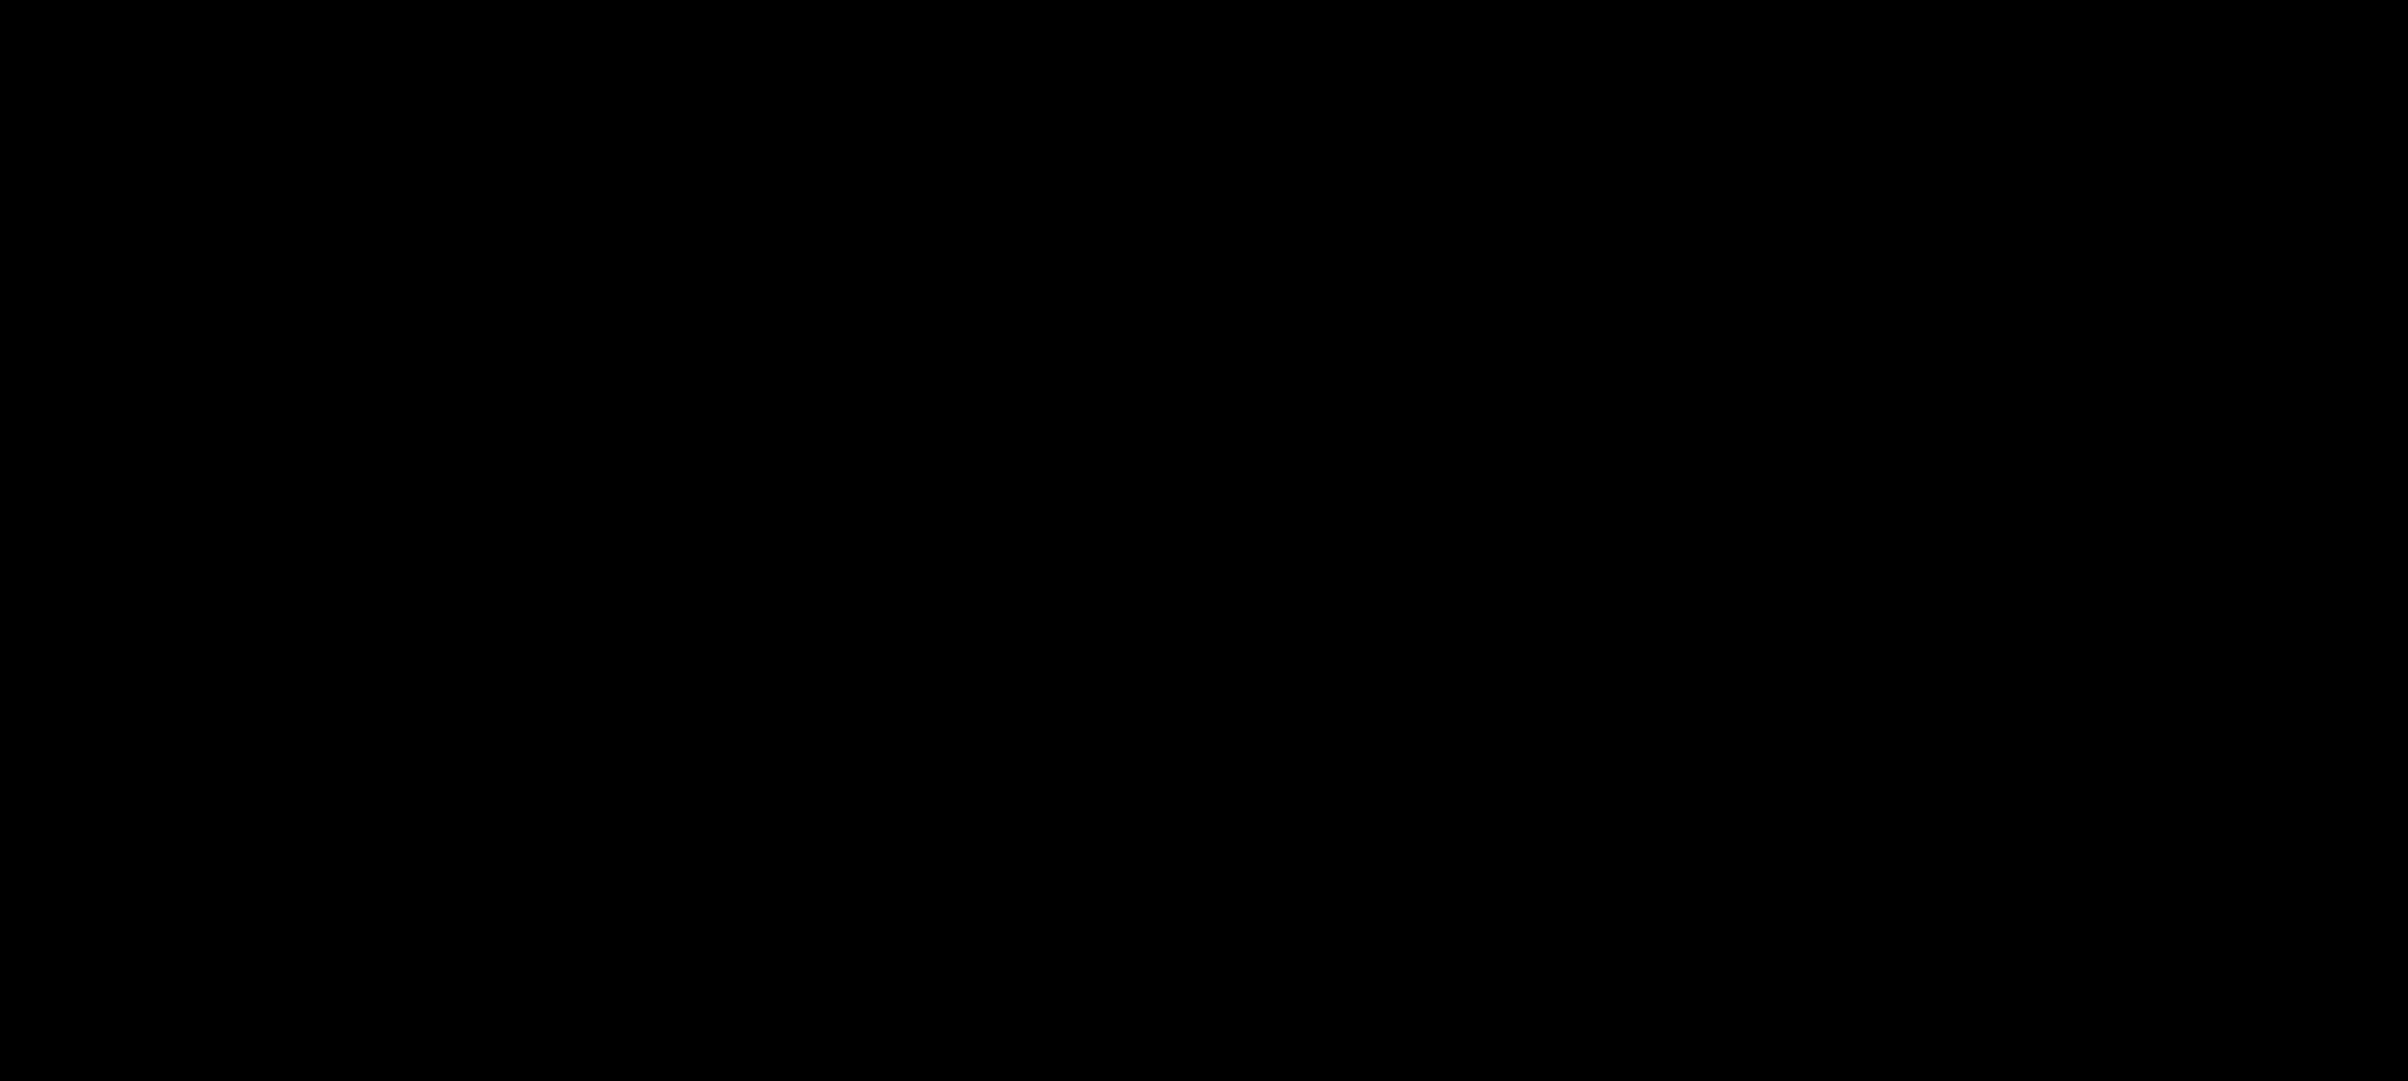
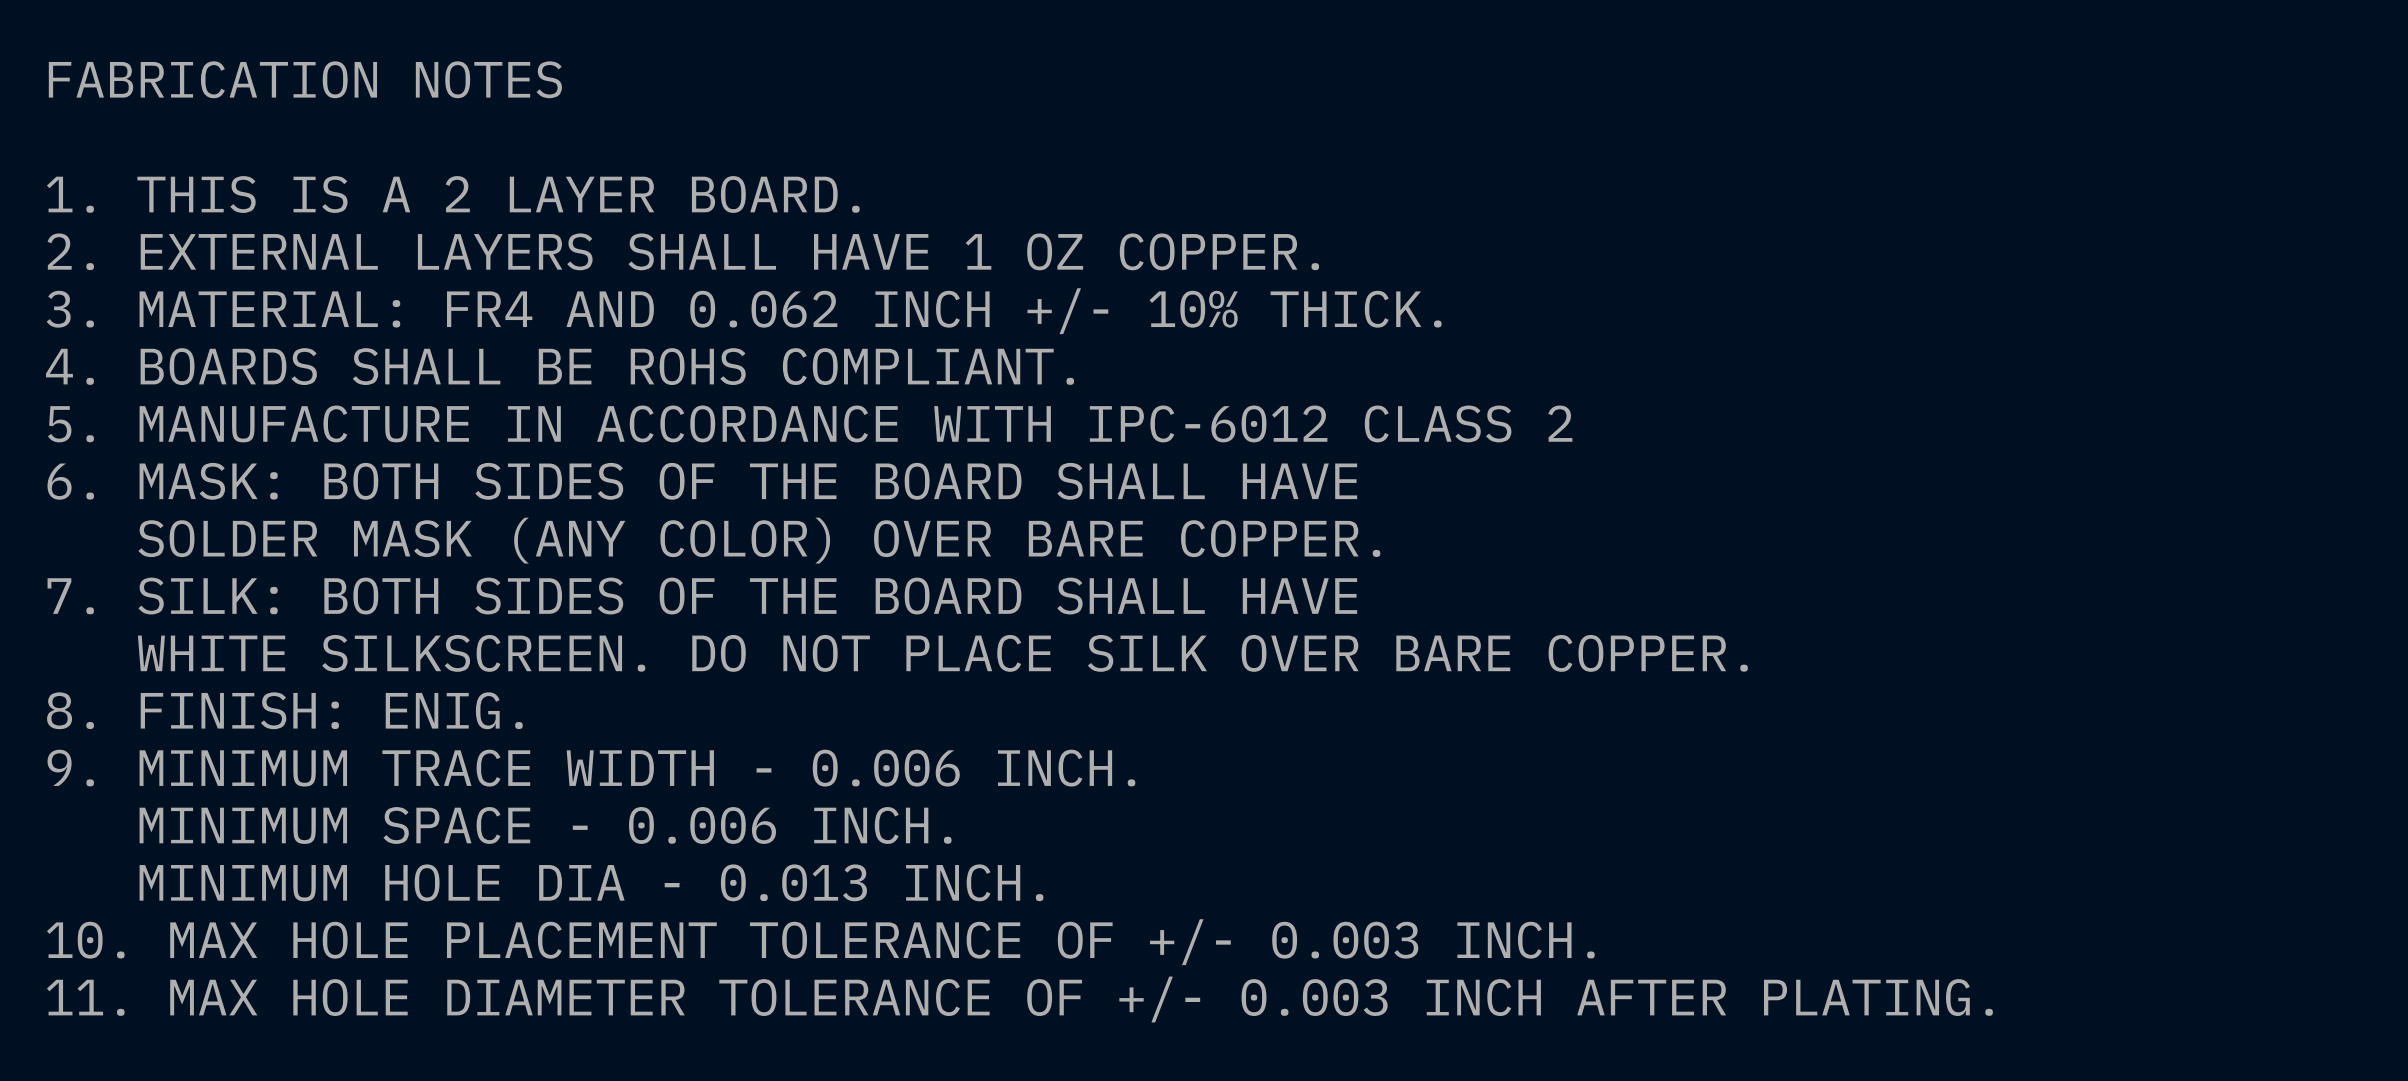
text: none -> FABRICATION NOTES (305, 79)
text: none -> 1. THIS IS A 2 LAYER BOARD. (453, 194)
text: none -> 2. EXTERNAL LAYERS SHALL HAVE 1 OZ COPPER. (683, 251)
text: none -> 3. MATERIAL: FR4 AND 0.062 INCH +/- 10% THICK. (744, 311)
text: none -> 4. BOARDS SHALL BE ROHS COMPLIANT. (560, 366)
text: none -> 5. MANUFACTURE IN ACCORDANCE WITH IPC-6012 CLASS 2 (810, 423)
text: none -> 6. MASK: BOTH SIDES OF THE BOARD SHALL HAVE (702, 481)
text: none -> SOLDER MASK (ANY COLOR) OVER BARE COPPER. (759, 540)
text: none -> 7. SILK: BOTH SIDES OF THE BOARD SHALL HAVE (702, 596)
text: none -> WHITE SILKSCREEN. DO NOT PLACE SILK OVER BARE COPPER. (942, 653)
text: none -> 8. FINISH: ENIG. (284, 710)
text: none -> 9. MINIMUM TRACE WIDTH - 0.006 INCH. (591, 768)
text: none -> MINIMUM SPACE - 0.006 INCH. (545, 825)
text: none -> MINIMUM HOLE DIA - 0.013 INCH. (591, 882)
text: none -> 10. MAX HOLE PLACEMENT TOLERANCE OF +/- 0.003 INCH. (820, 942)
text: none -> 11. MAX HOLE DIAMETER TOLERANCE OF +/- 0.003 INCH AFTER PLATING. (1019, 999)

